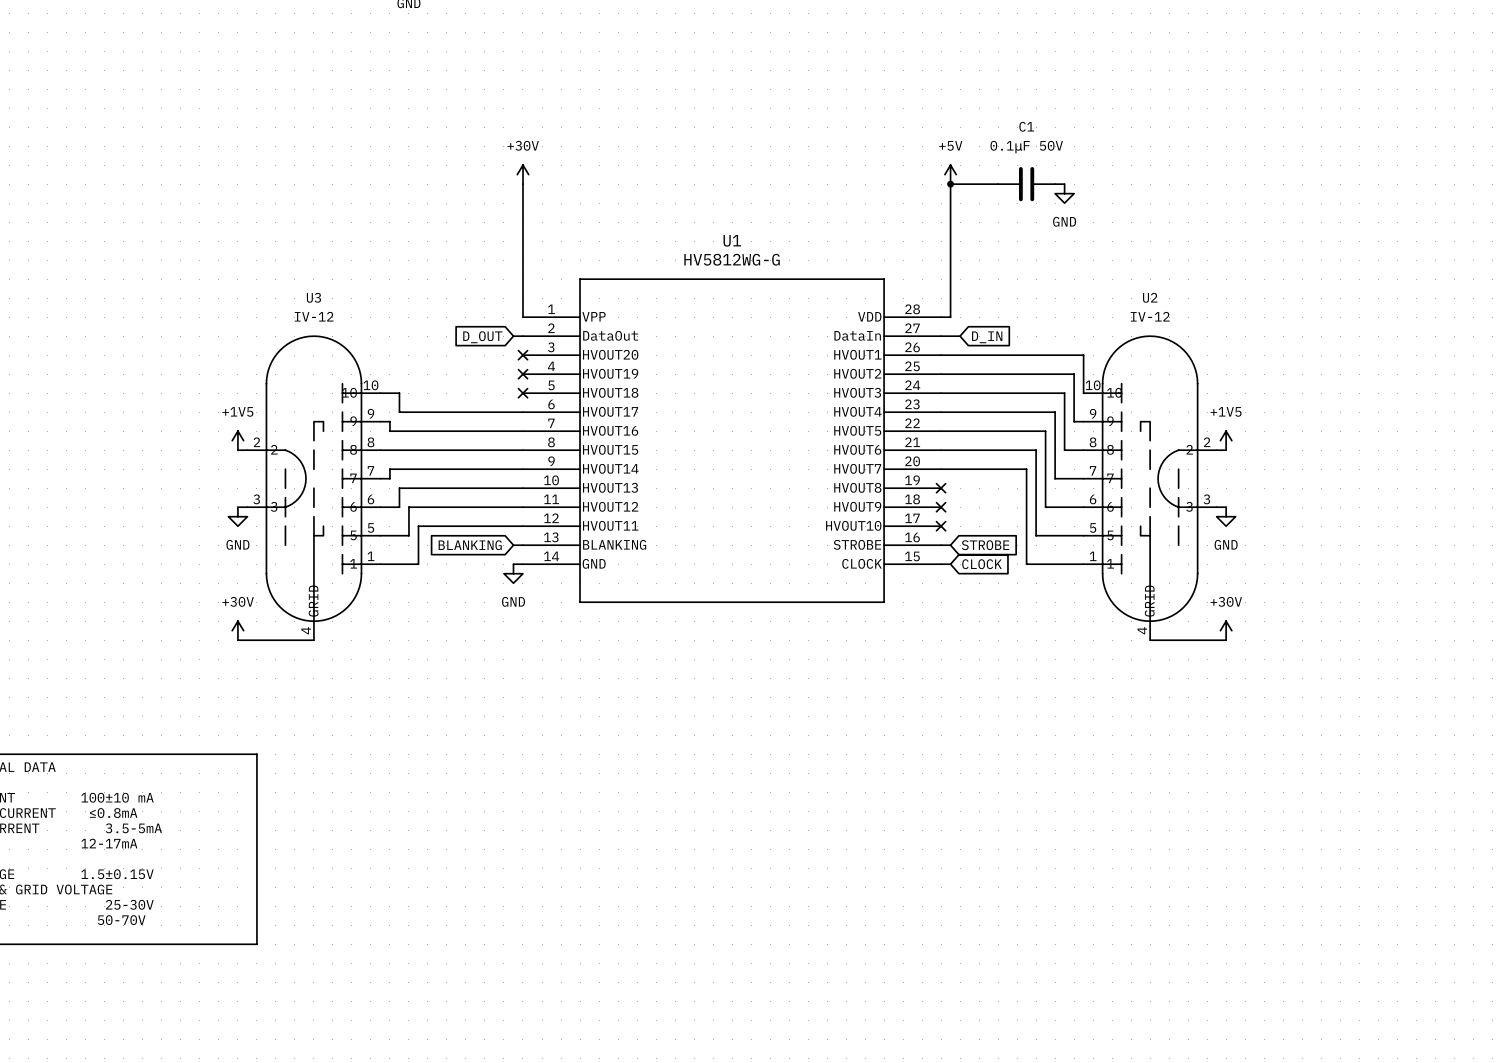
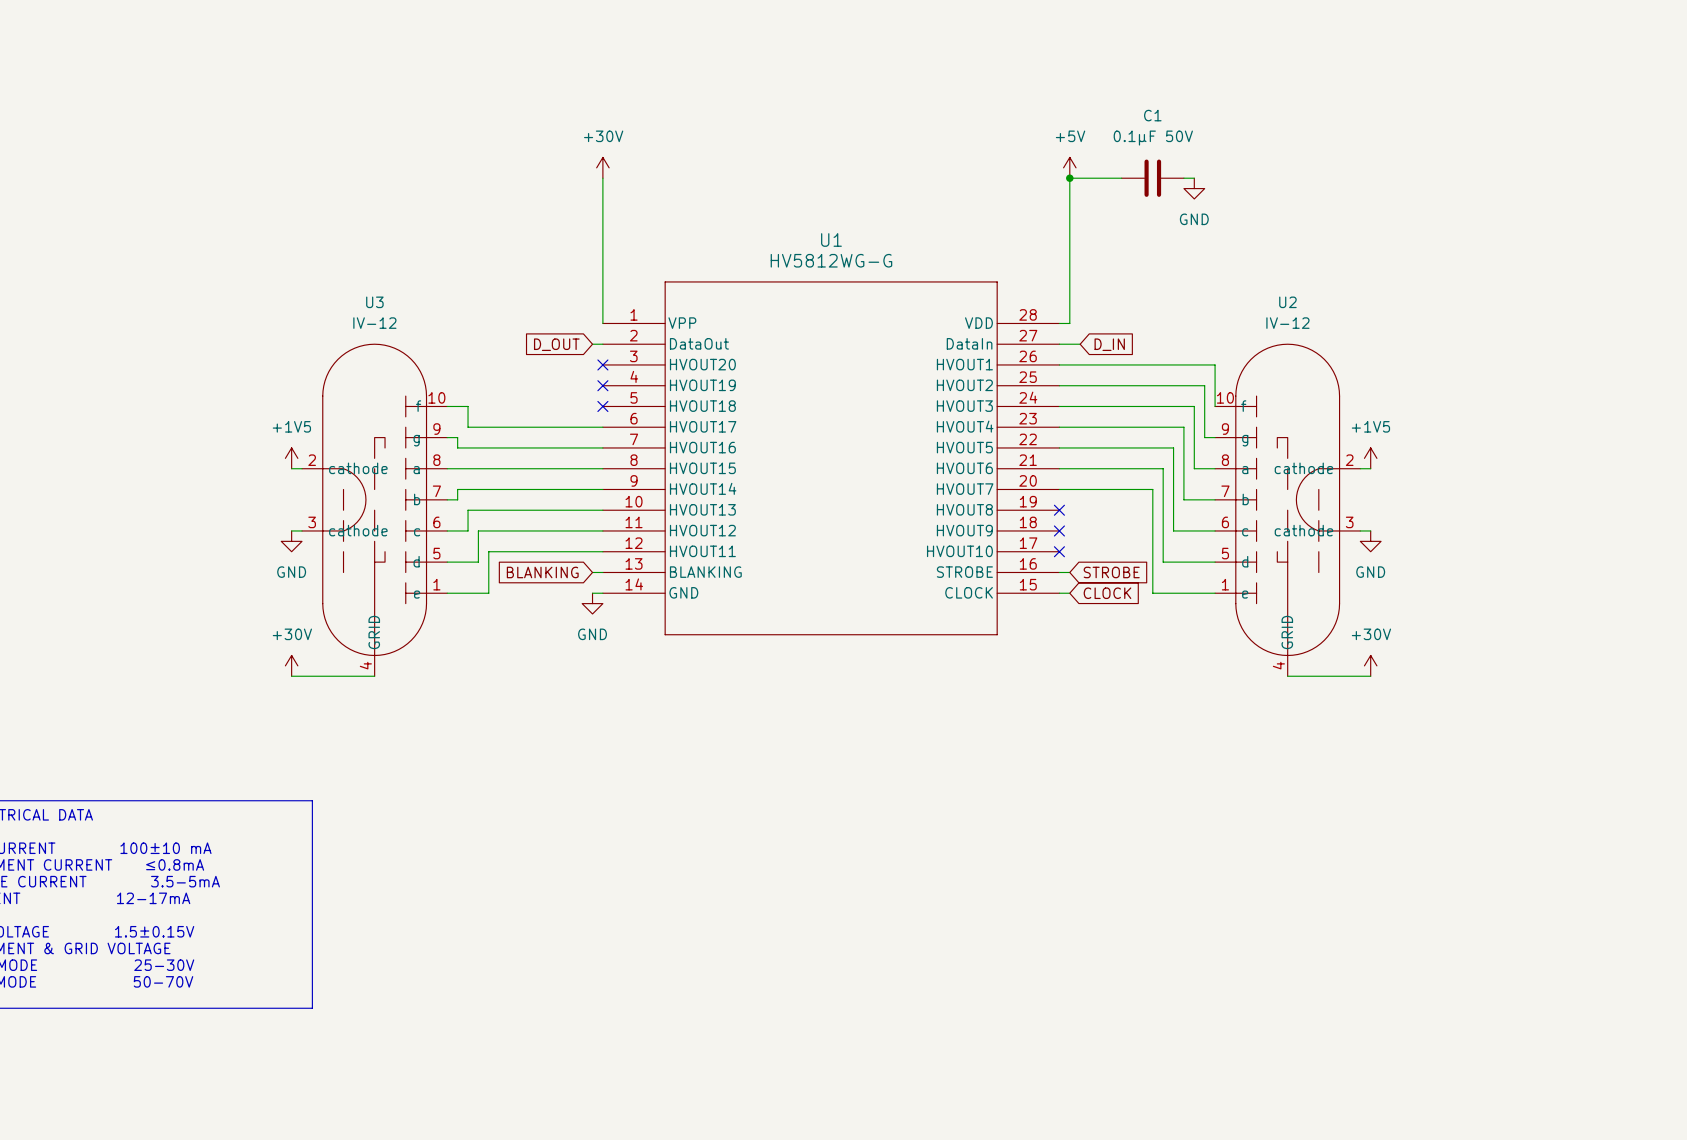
U3 symbol: [247, 336, 381, 641] -> [302, 344, 448, 677]
U2 symbol: [1083, 336, 1217, 641] -> [1215, 344, 1361, 677]

